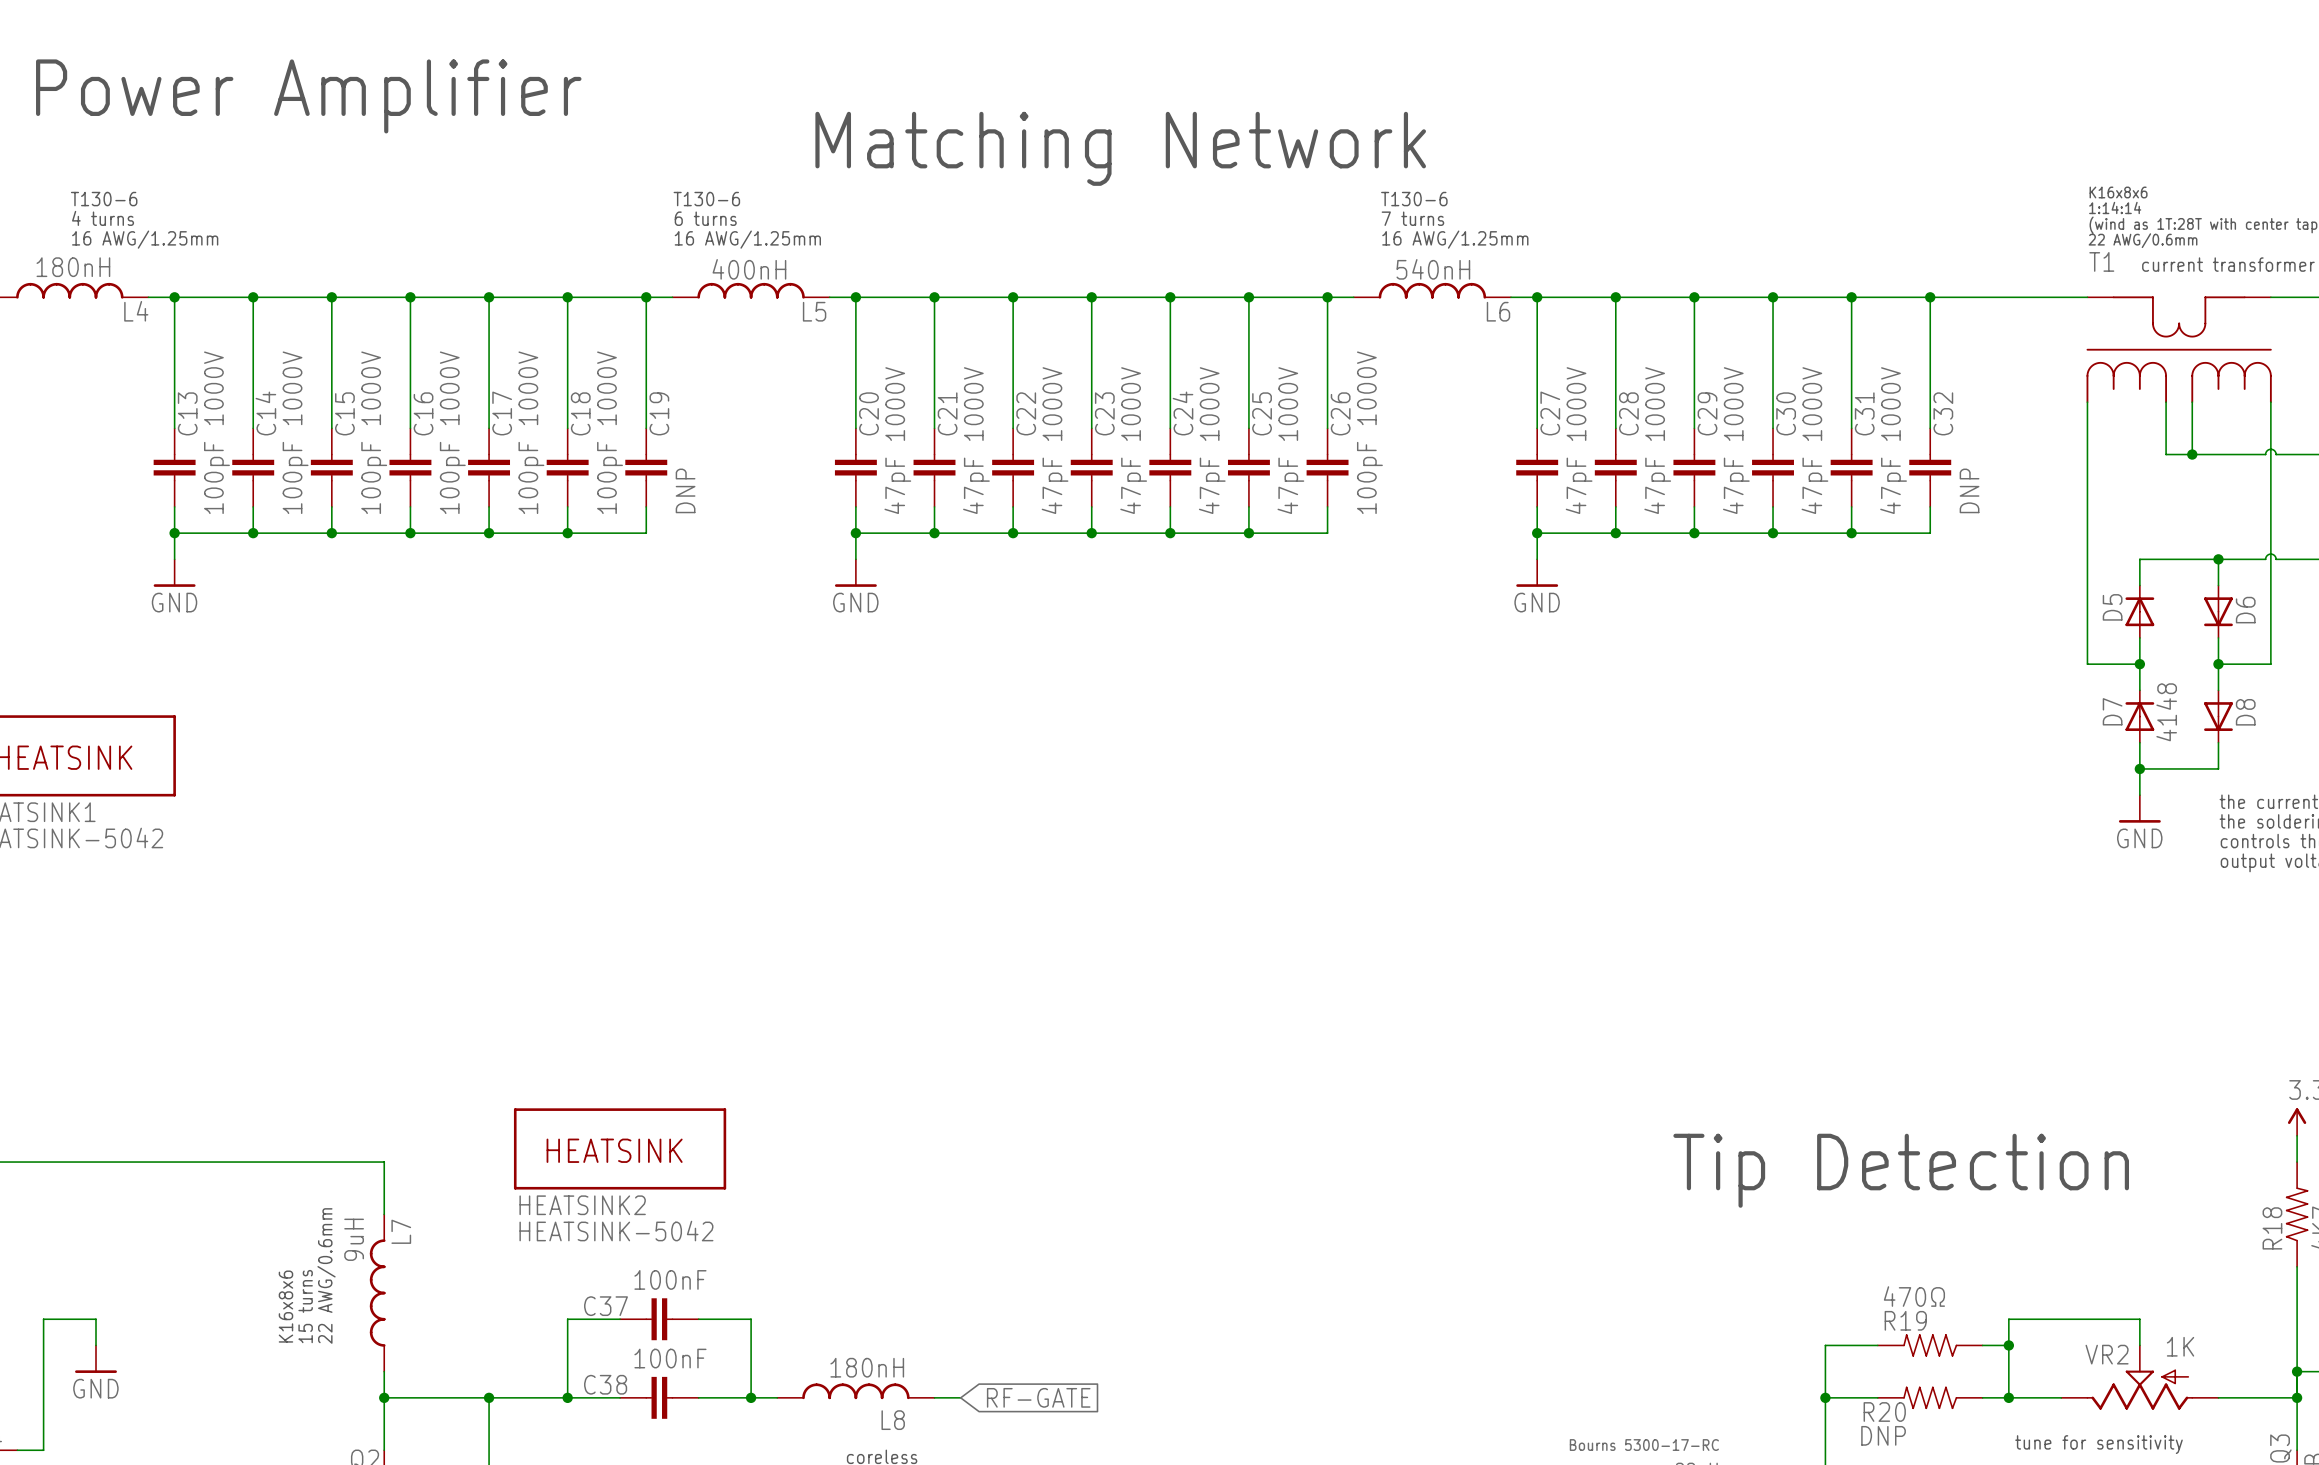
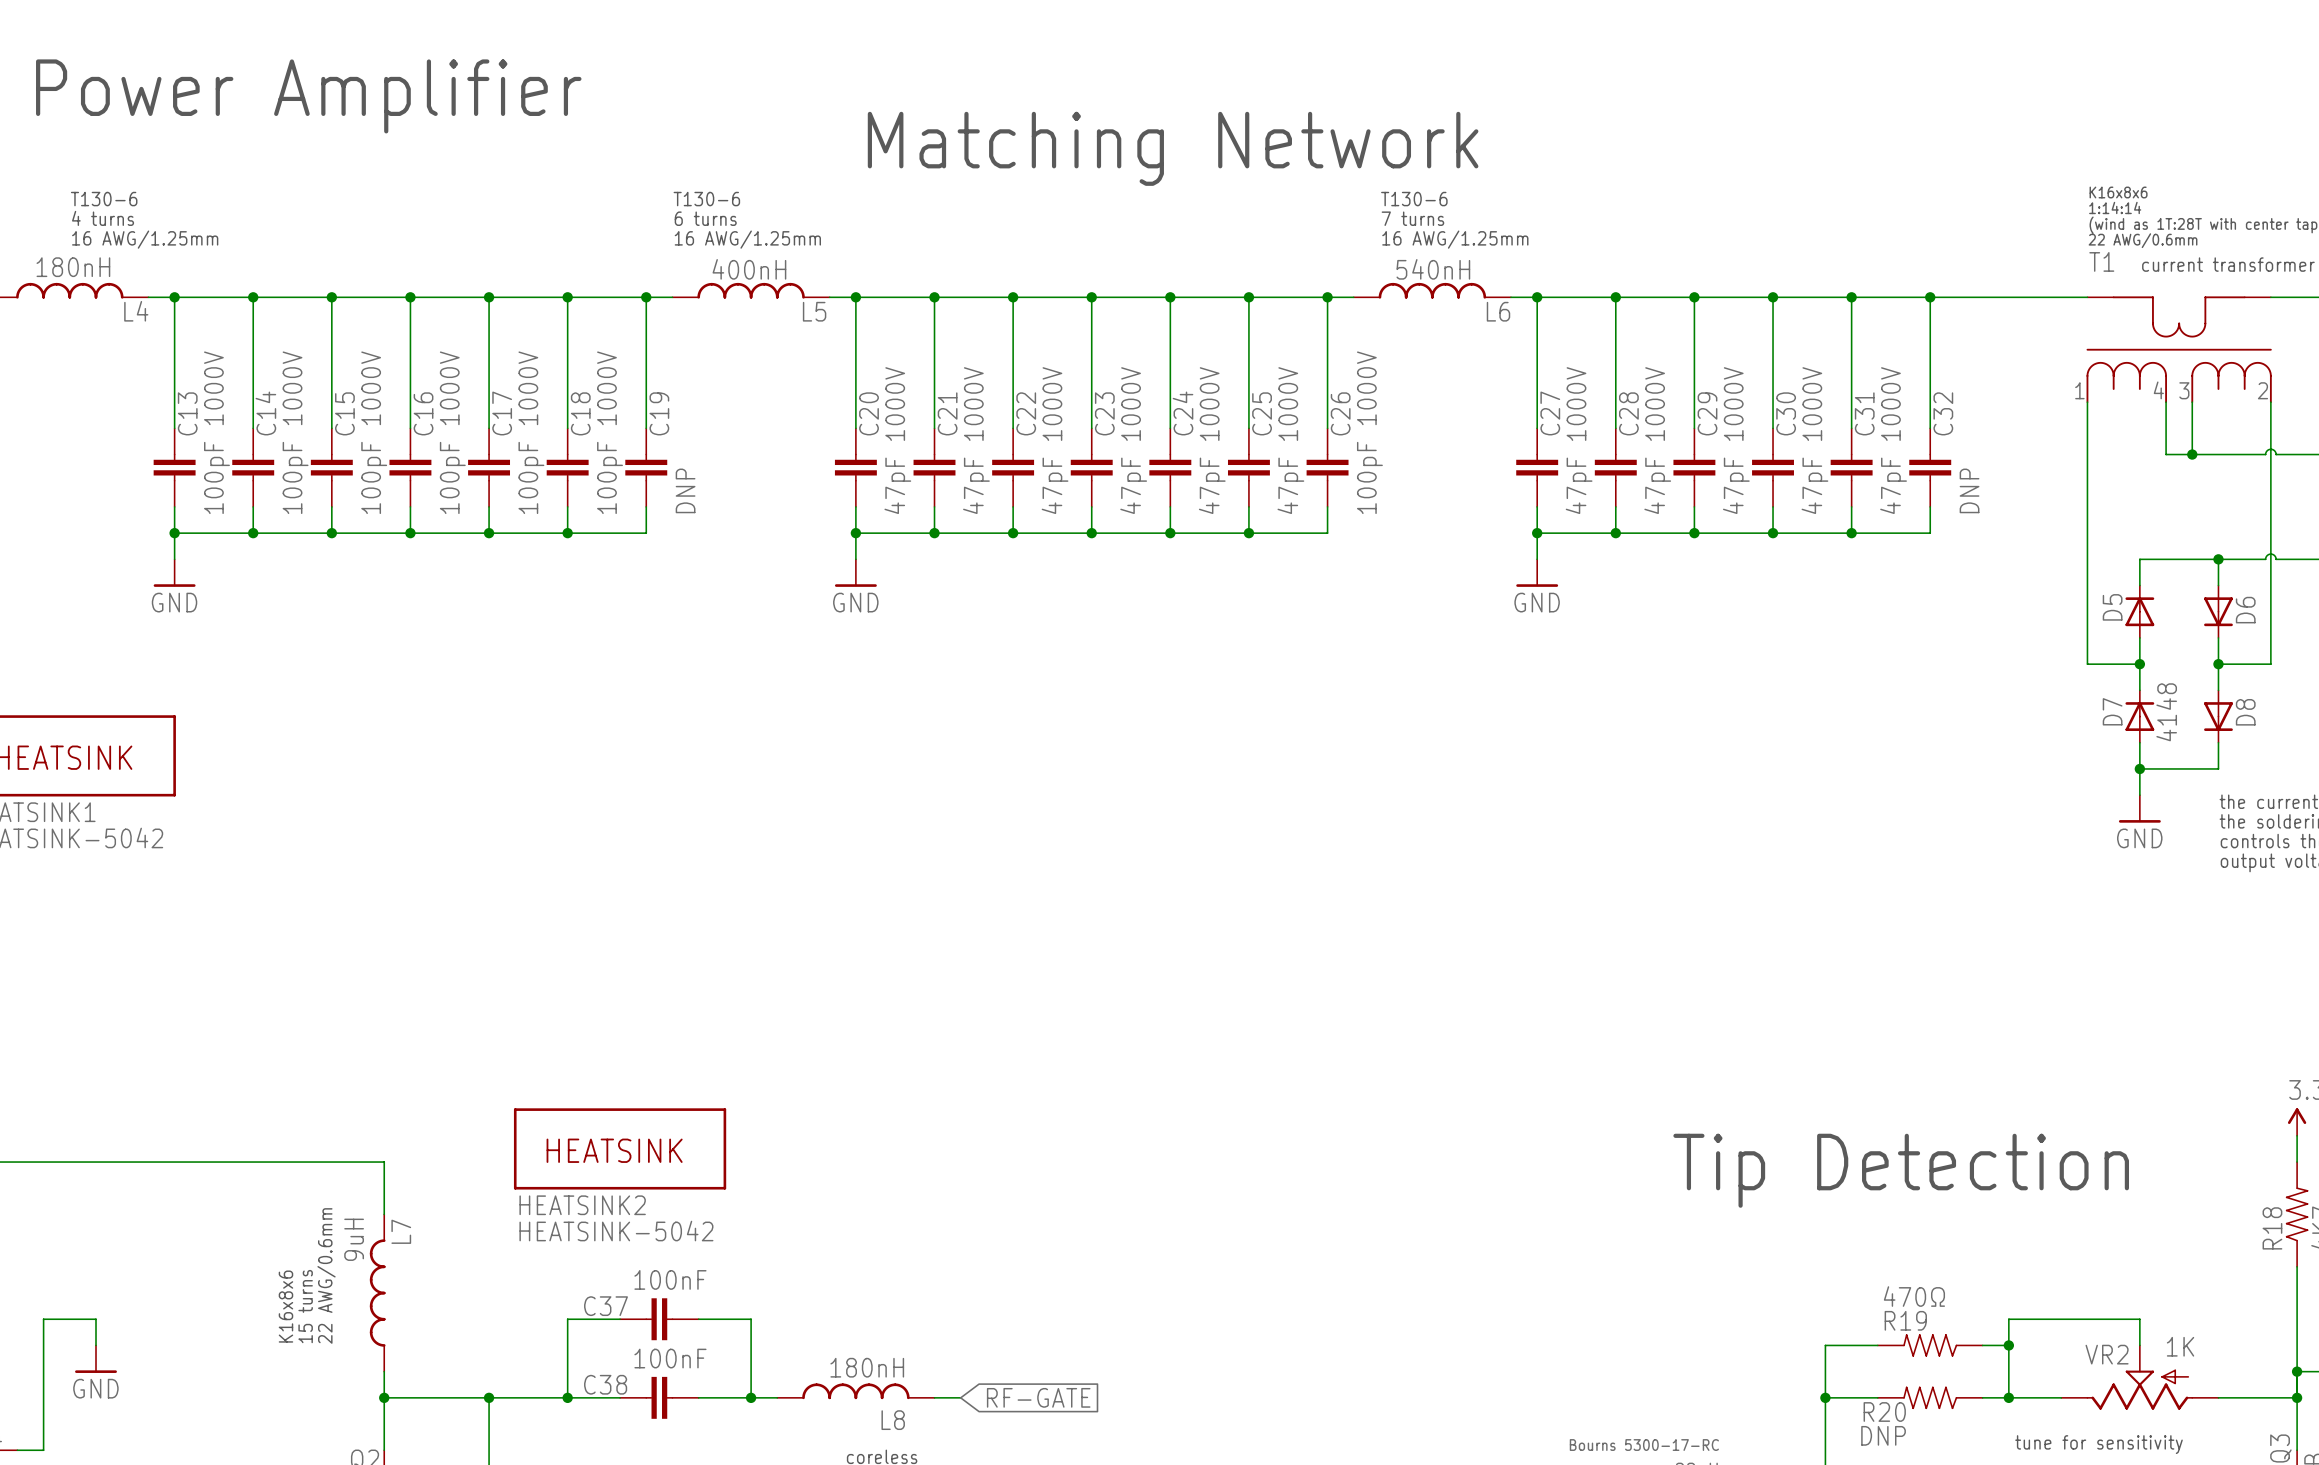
text position: Matching Network (1120, 148) -> Matching Network (1173, 148)
T1 pin number: none -> 1 (2079, 390)
T1 pin number: none -> 4 (2158, 390)
T1 pin number: none -> 3 (2184, 390)
T1 pin number: none -> 2 (2262, 390)

